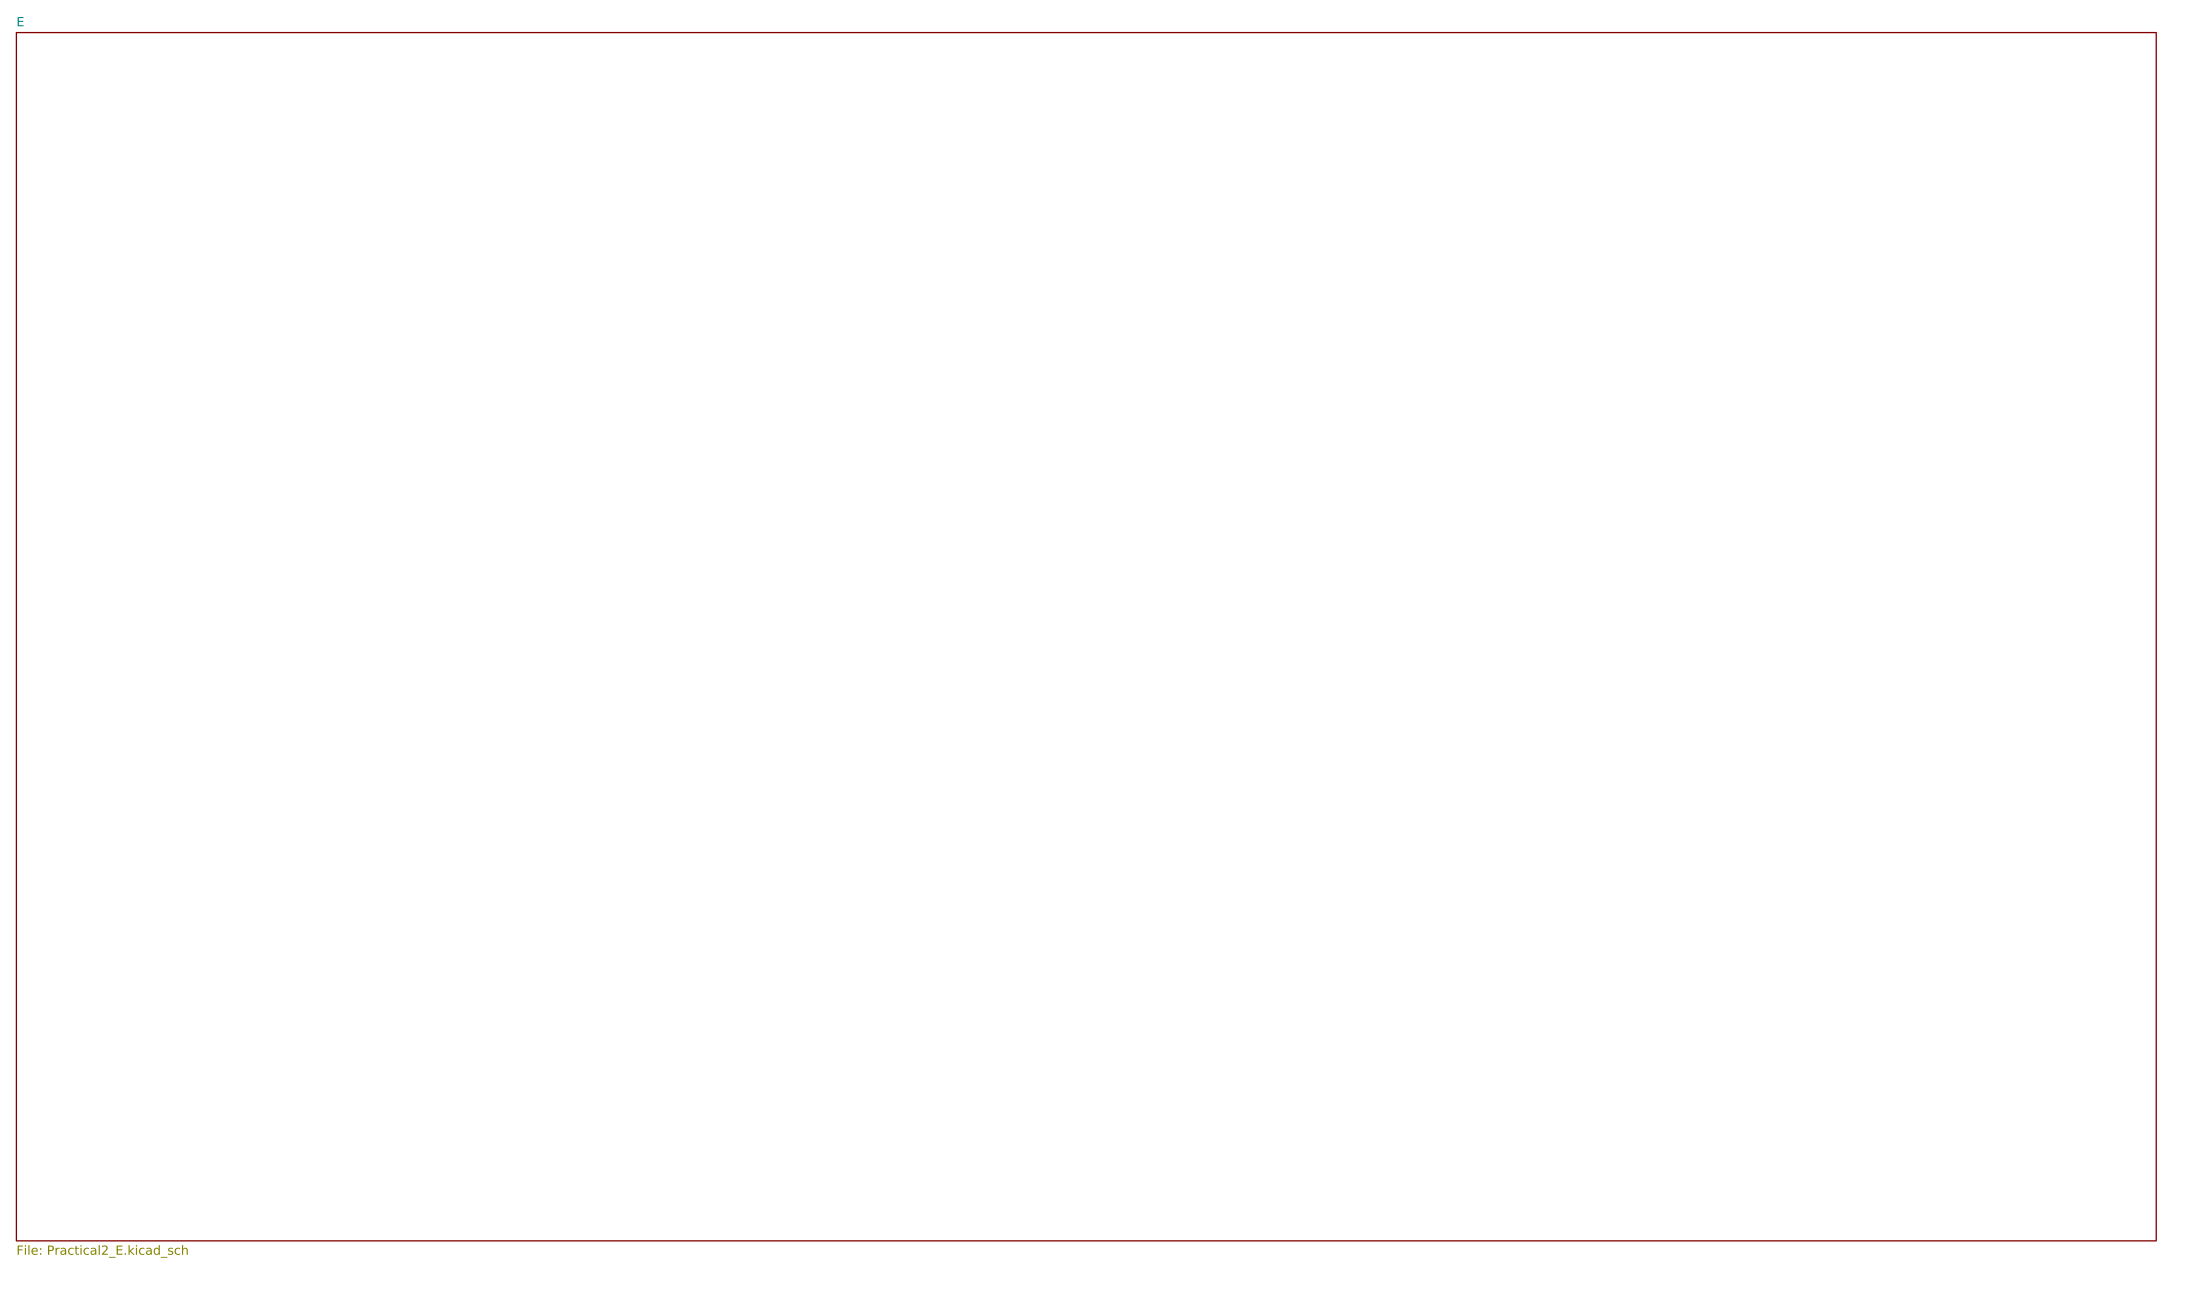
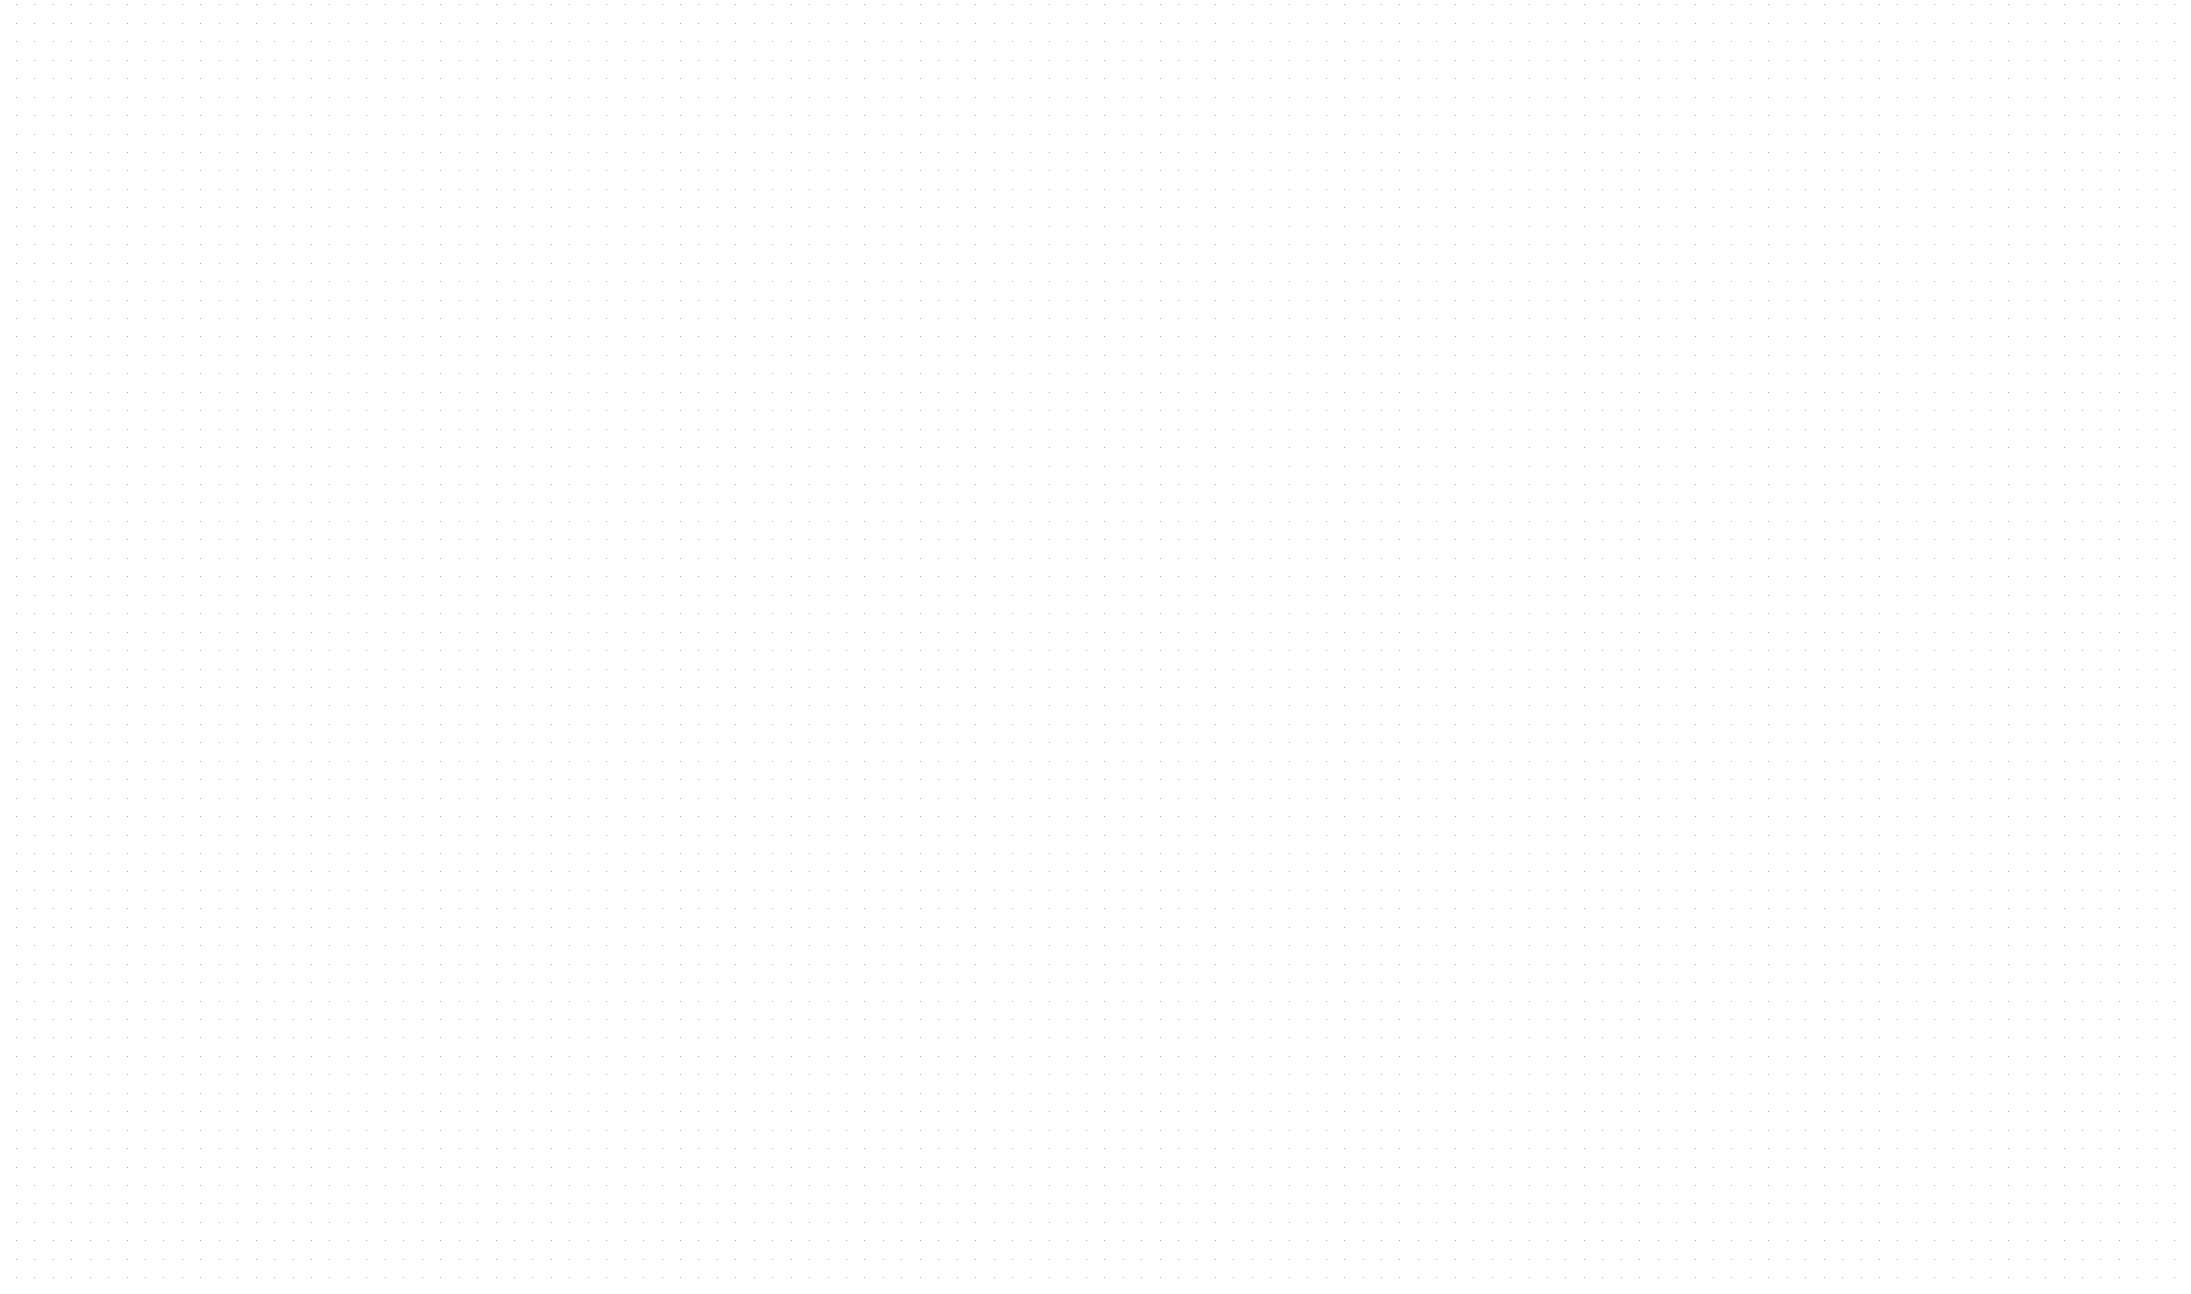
sheet E: File: Practical2_E.kicad_sch (1086, 636) -> none

